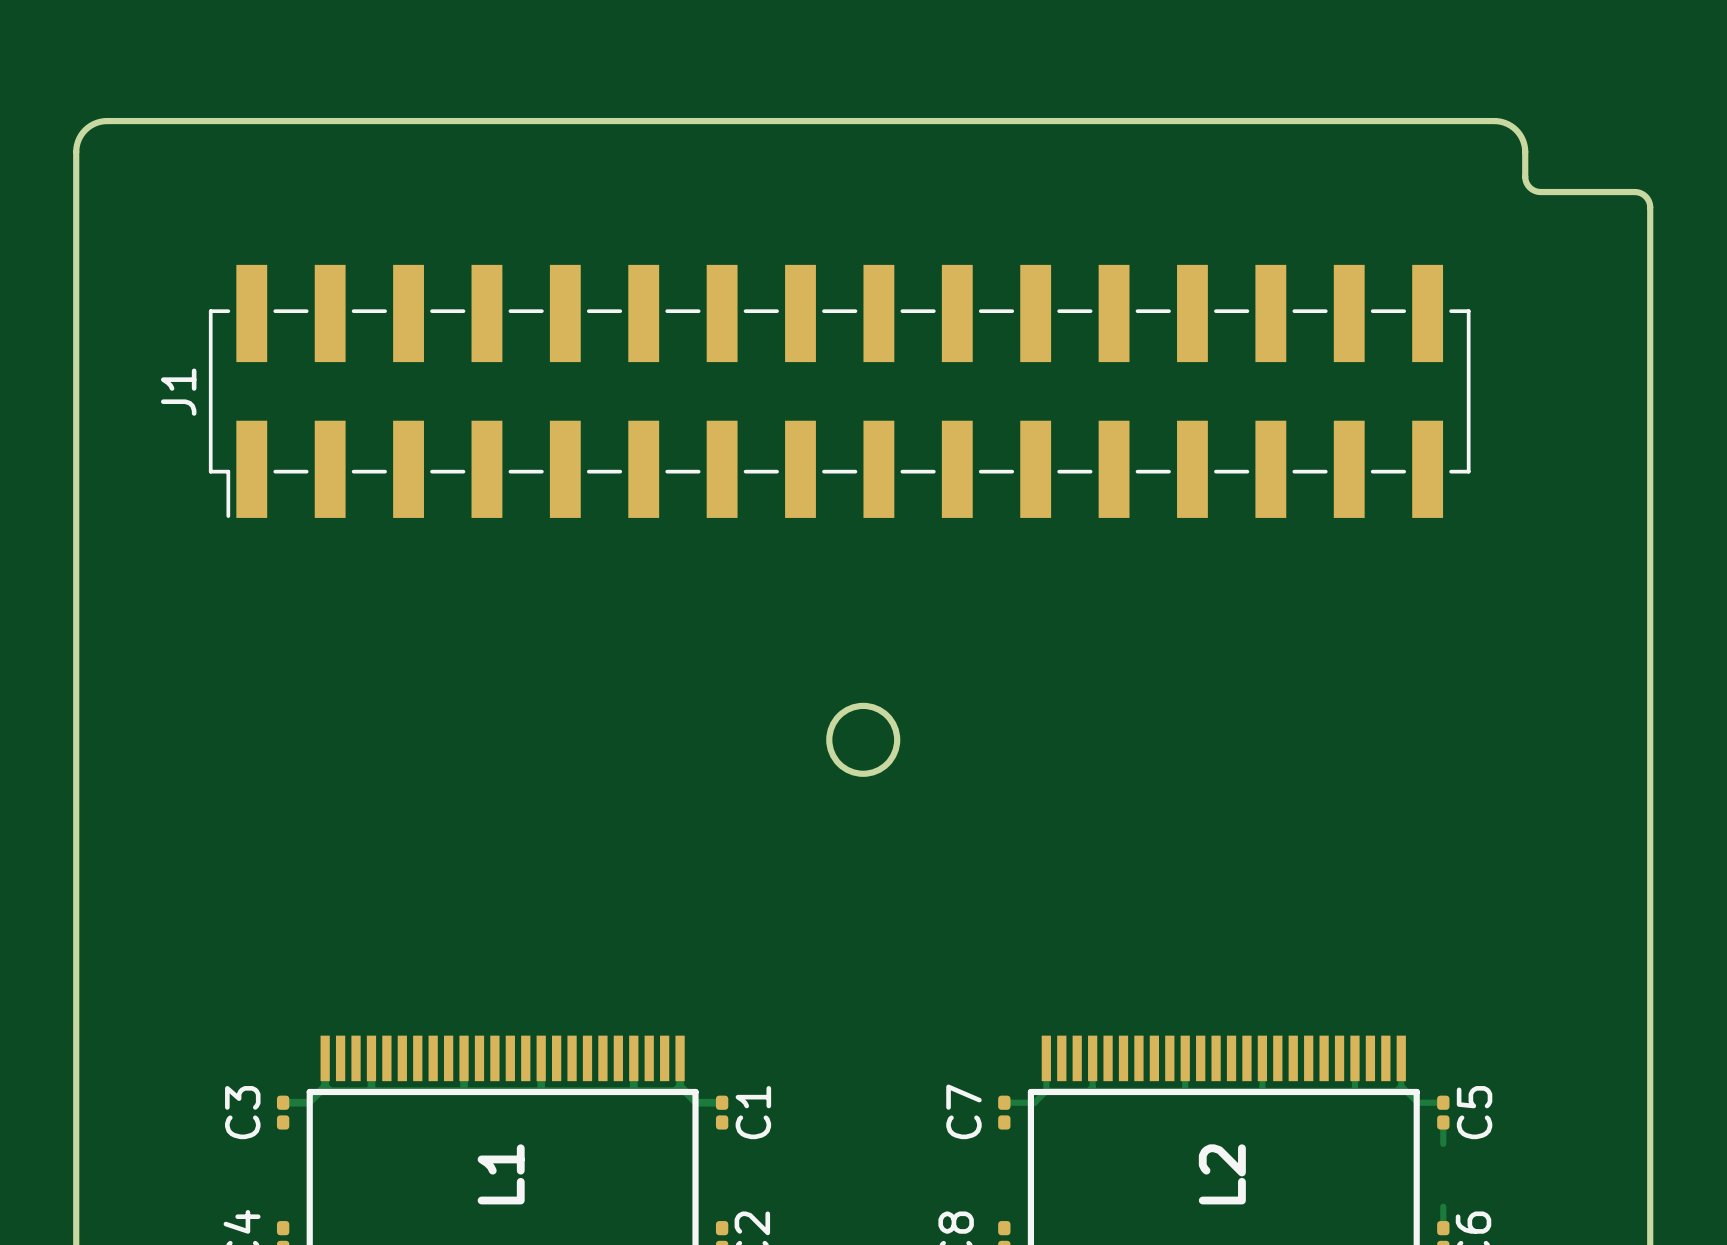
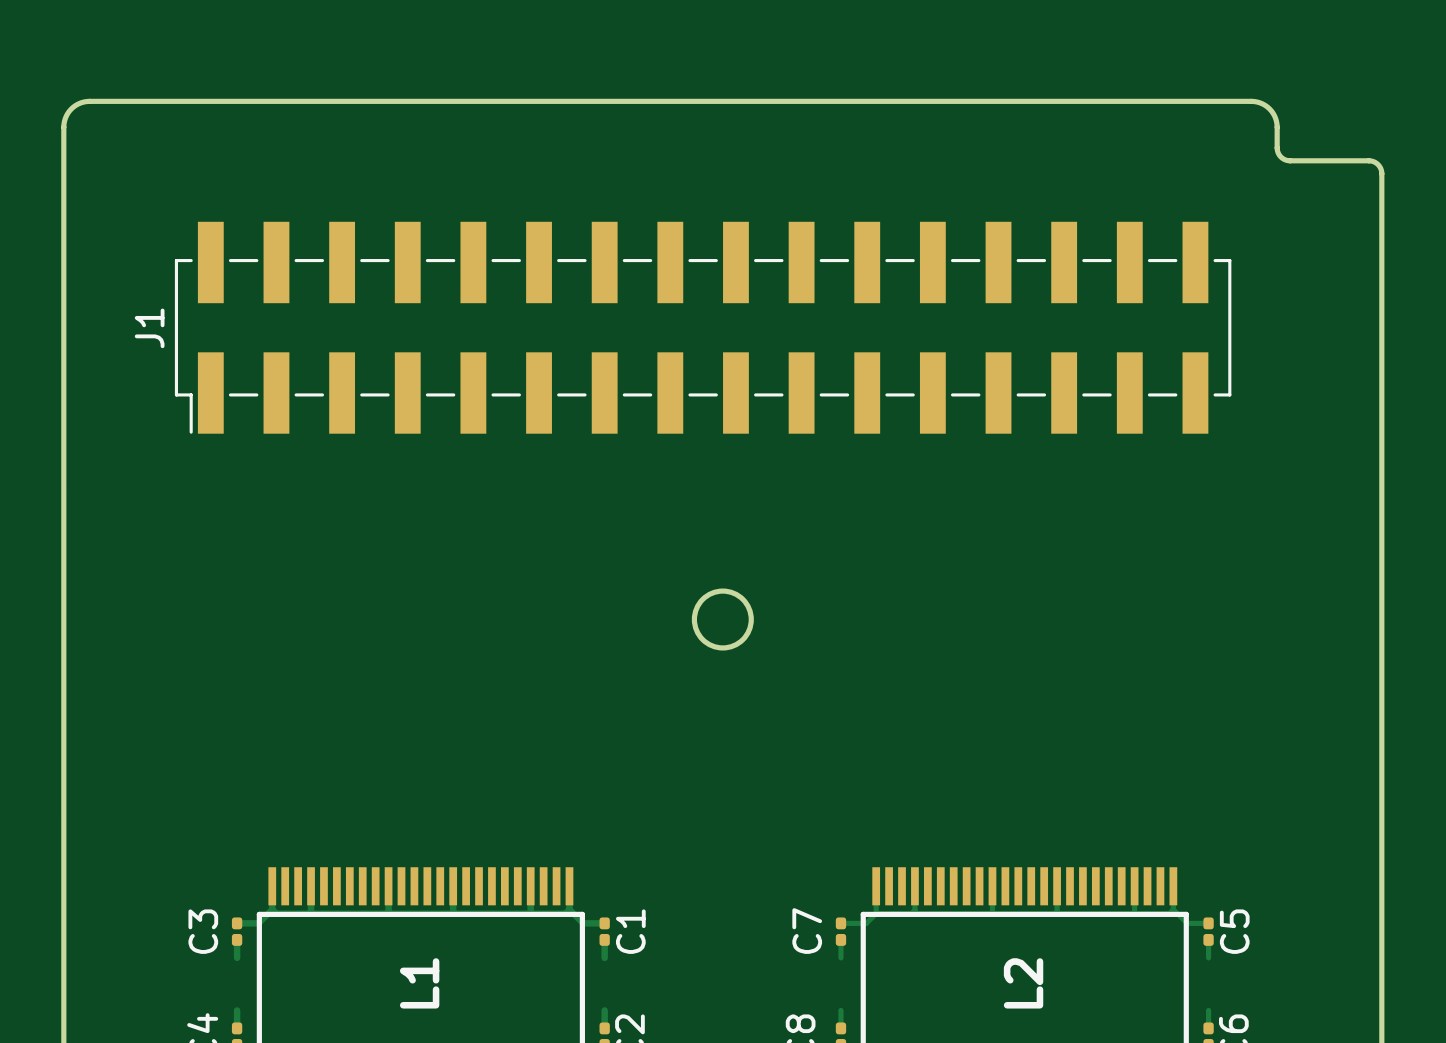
track: none -> (237, 939) (237, 957)
track: none -> (604, 939) (604, 957)
track: none -> (840, 939) (840, 957)
track: none -> (237, 1010) (237, 1028)
track: none -> (604, 1010) (604, 1028)
track: none -> (840, 1010) (840, 1028)

